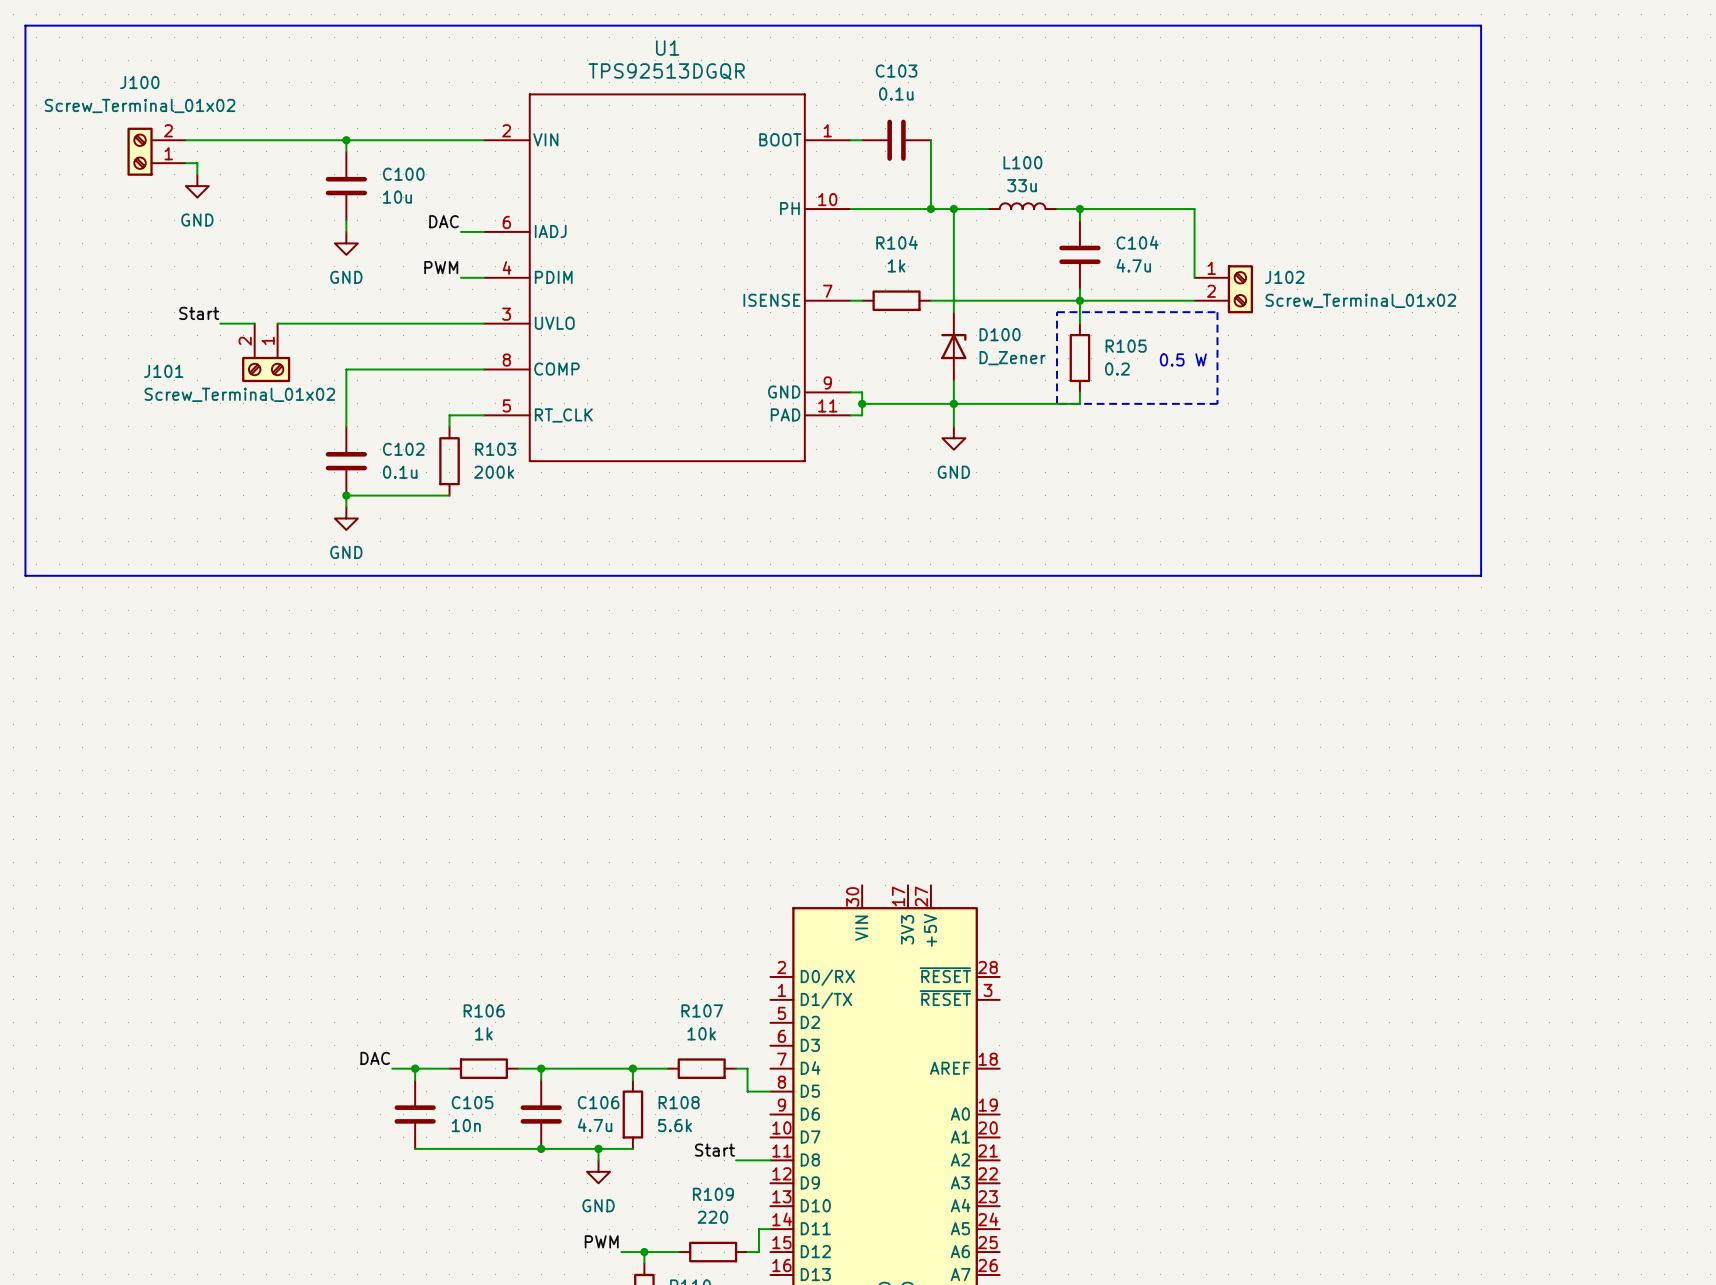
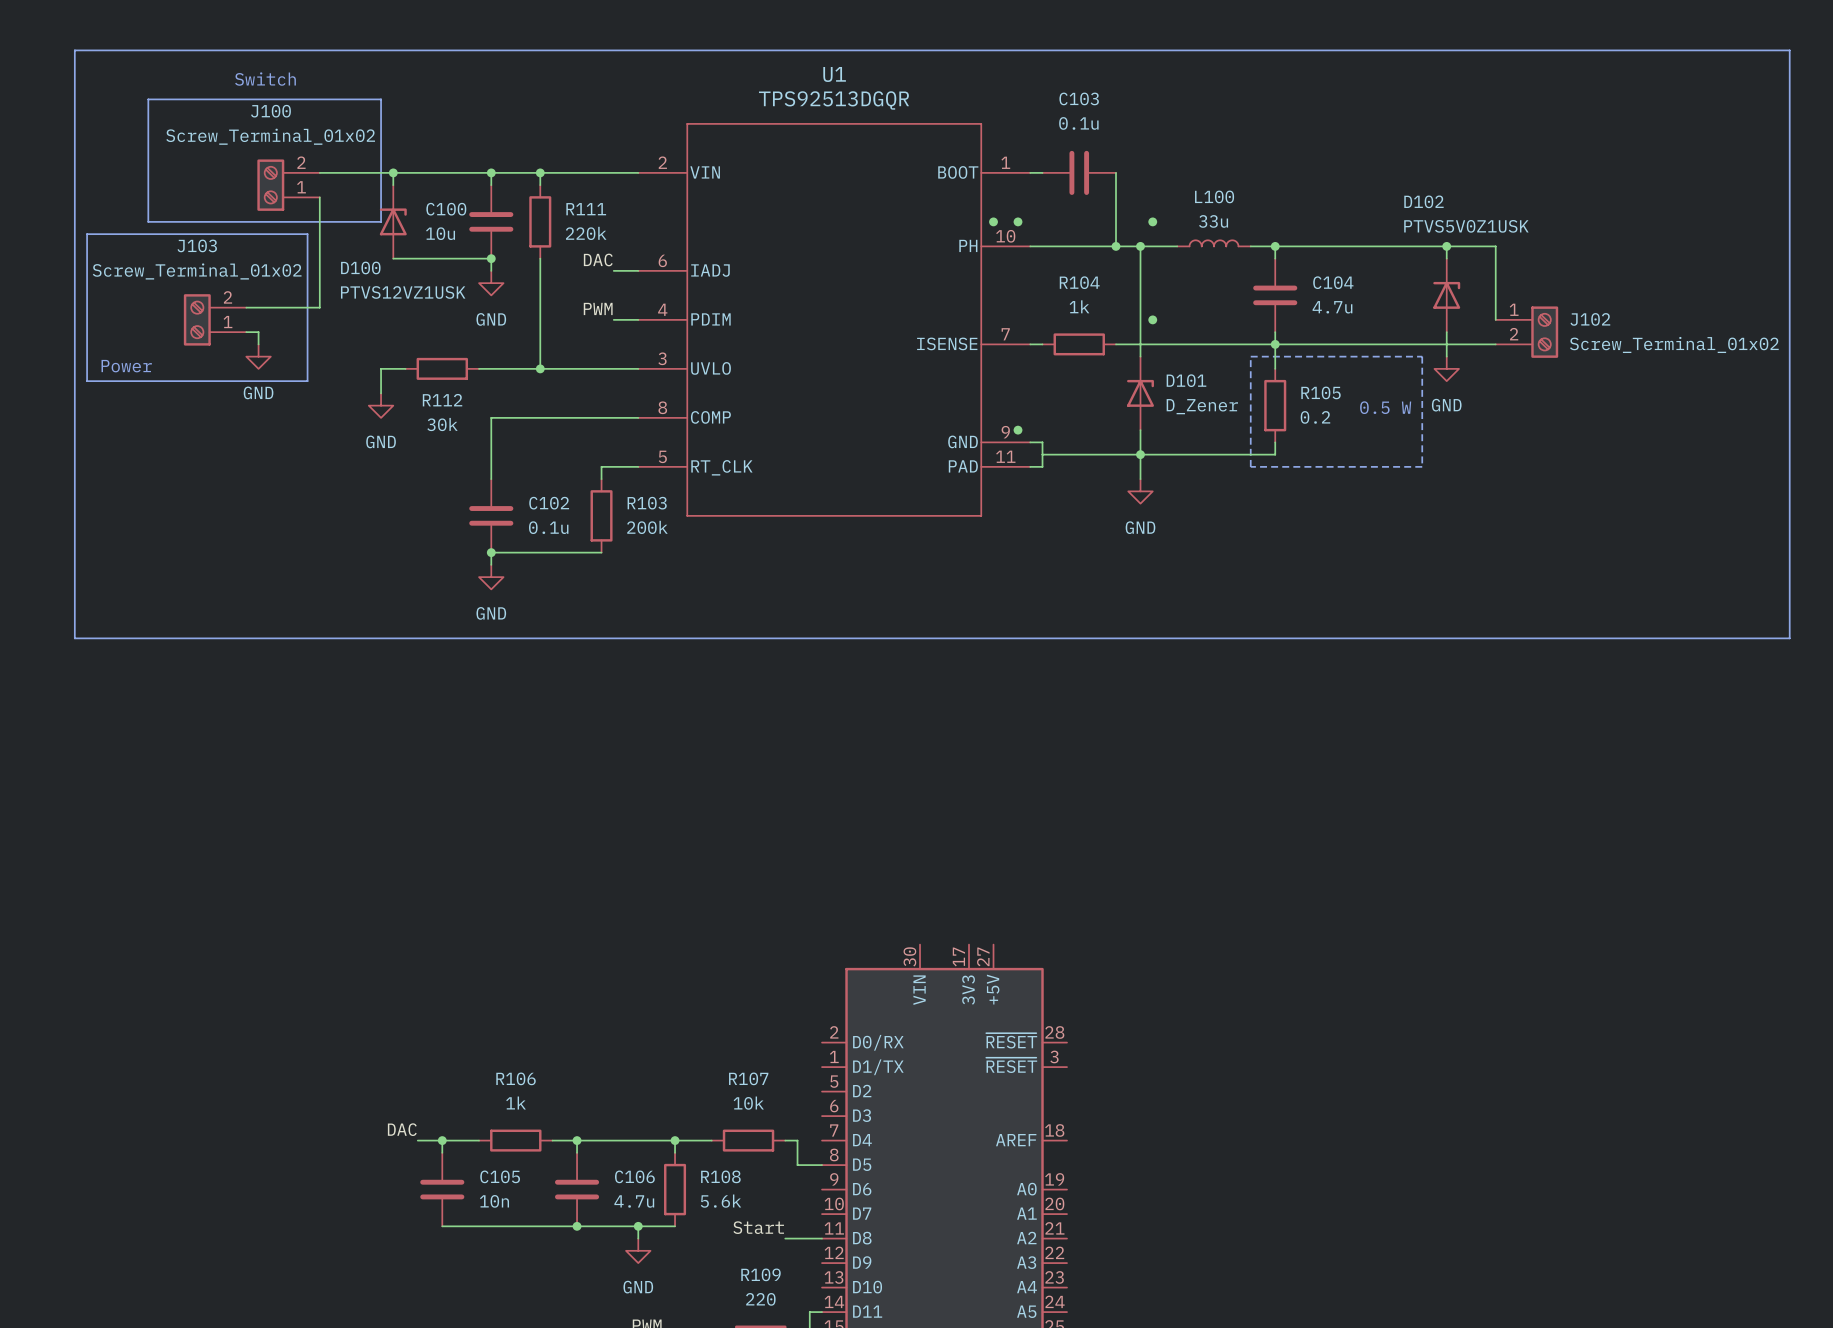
line: (25, 25) (1481, 25) (1481, 575) (25, 575) (25, 25) -> (74, 50) (74, 638) (1789, 638) (1789, 50) (74, 50)
text: none -> Switch (265, 79)
line: none -> (148, 99) (381, 99) (381, 221) (148, 221) (148, 99)
wire: (185, 140) (483, 140) -> (319, 172) (638, 172)
wire: (346, 140) (346, 151) -> (491, 172) (491, 185)
junction position: (346, 140) -> (393, 172)
wire: (850, 140) (862, 140) -> (1030, 172) (1042, 172)
C103 position: (896, 140) -> (1079, 172)
wire: (930, 140) (930, 209) -> (1116, 172) (1116, 246)
J100 position: (156, 151) -> (288, 185)
wire: (185, 163) (197, 163) (197, 174) -> (246, 332) (258, 332) (258, 344)
junction: none -> (491, 172)
wire: none -> (540, 172) (540, 185)
junction: none -> (540, 172)
C100 name position: C100 (403, 174) -> C100 (446, 209)
power symbol: GND (197, 186) -> none
wire: none -> (319, 197) (319, 307) (246, 307)
C100 position: (346, 186) -> (491, 221)
C100 value position: 10u (397, 197) -> 10u (440, 233)
L100 position: (1022, 206) -> (1213, 243)
R111: none -> 220k (540, 221)
wire: (850, 209) (988, 209) -> (1030, 246) (1177, 246)
wire: (953, 209) (953, 312) -> (1140, 246) (1140, 356)
wire: (1057, 209) (1194, 209) (1194, 231) -> none
wire: (1079, 209) (1079, 220) -> none
line: none -> (87, 234) (307, 234) (307, 381) (87, 381) (87, 234)
wire: (346, 220) (346, 231) -> (393, 172) (393, 185)
label position: DAC (443, 221) -> DAC (598, 259)
wire: (460, 231) (483, 231) -> (613, 270) (638, 270)
junction: none -> (1116, 246)
junction: none -> (1140, 246)
wire: none -> (1250, 246) (1495, 246) (1495, 319)
junction: none -> (1275, 246)
wire: none -> (1446, 246) (1446, 258)
junction: none -> (1446, 246)
power symbol: GND (346, 243) -> none
wire: none -> (393, 258) (491, 258) (491, 270)
junction: none -> (491, 258)
wire: none -> (540, 258) (540, 368)
C104 position: (1079, 254) -> (1275, 295)
power symbol: none -> GND (491, 283)
label position: PWM (441, 267) -> PWM (598, 308)
wire: (460, 277) (483, 277) -> (613, 319) (638, 319)
U1 position: (667, 277) -> (834, 319)
D102: none -> PTVS5V0Z1USK (1446, 295)
wire: (1079, 289) (1079, 323) -> (1275, 332) (1275, 368)
J102 position: (1223, 289) -> (1526, 332)
J103: none -> Screw_Terminal_01x02 (215, 319)
wire: (850, 300) (862, 300) -> (1030, 344) (1042, 344)
R104 position: (896, 300) -> (1079, 344)
wire: (930, 300) (1194, 300) -> none
line: (1057, 312) (1217, 312) (1217, 403) (1057, 403) (1057, 312) -> none
wire: none -> (1446, 332) (1446, 356)
label: Start (199, 313) -> none
wire: (220, 323) (254, 323) -> none
wire: (277, 323) (483, 323) -> none
wire: none -> (1116, 344) (1495, 344)
junction: none -> (1275, 344)
D100 name position: D100 (1000, 334) -> D100 (360, 267)
power symbol: none -> GND (258, 356)
line: none -> (1250, 356) (1422, 356) (1422, 466) (1250, 466) (1250, 356)
text: none -> Power (126, 366)
wire: none -> (405, 368) (381, 368) (381, 393)
R112: none -> 30k (442, 368)
wire: none -> (479, 368) (638, 368)
junction: none -> (540, 368)
D100 position: (953, 346) -> (393, 221)
power symbol: none -> GND (1446, 368)
J101: Screw_Terminal_01x02 (266, 352) -> none
D100 value: D_Zener (1012, 358) -> PTVS12VZ1USK (403, 292)
R105 position: (1079, 358) -> (1275, 405)
text position: 0.5 W (1183, 359) -> 0.5 W (1385, 407)
wire: (483, 369) (346, 369) (346, 426) -> (638, 417) (491, 417) (491, 479)
D101: none -> D_Zener (1140, 393)
power symbol: none -> GND (381, 405)
wire: (953, 380) (953, 426) -> (1140, 430) (1140, 479)
wire: (850, 392) (862, 392) (862, 415) (850, 415) -> (1030, 442) (1042, 442) (1042, 466) (1030, 466)
wire: (1079, 392) (1079, 403) (862, 403) -> (1275, 442) (1275, 454) (1042, 454)
junction: (862, 403) -> none
wire: (483, 415) (449, 415) (449, 426) -> (638, 466) (601, 466) (601, 479)
junction: none -> (1140, 454)
power symbol position: GND (953, 438) -> GND (1140, 491)
C102 position: (346, 461) -> (491, 515)
R103 position: (449, 461) -> (601, 515)
junction: (346, 495) -> none
wire: (449, 495) (346, 495) (346, 507) -> (601, 552) (491, 552) (491, 564)
power symbol: GND (346, 518) -> none
junction: none -> (491, 552)
power symbol: none -> GND (491, 577)

